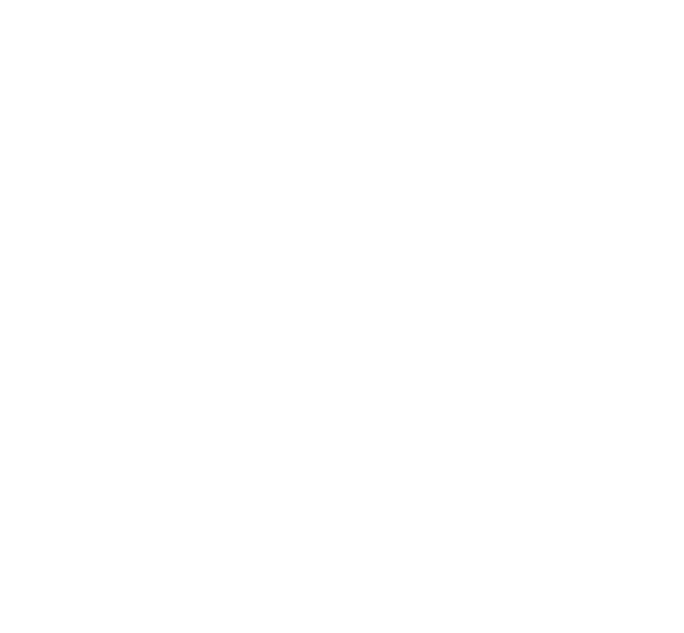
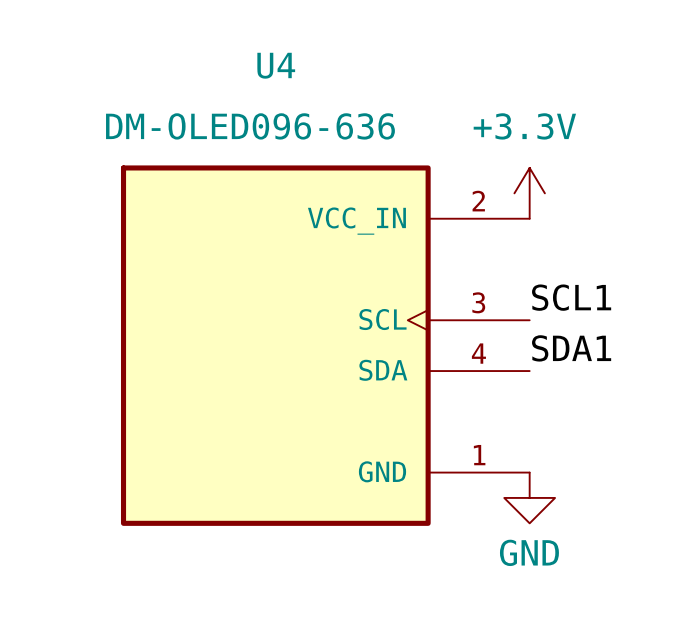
power symbol: none -> +3.3V (529, 193)
label: none -> SCL1 (571, 297)
U4: none -> DM-OLED096-636 (325, 345)
label: none -> SDA1 (571, 348)
power symbol: none -> GND (529, 497)

